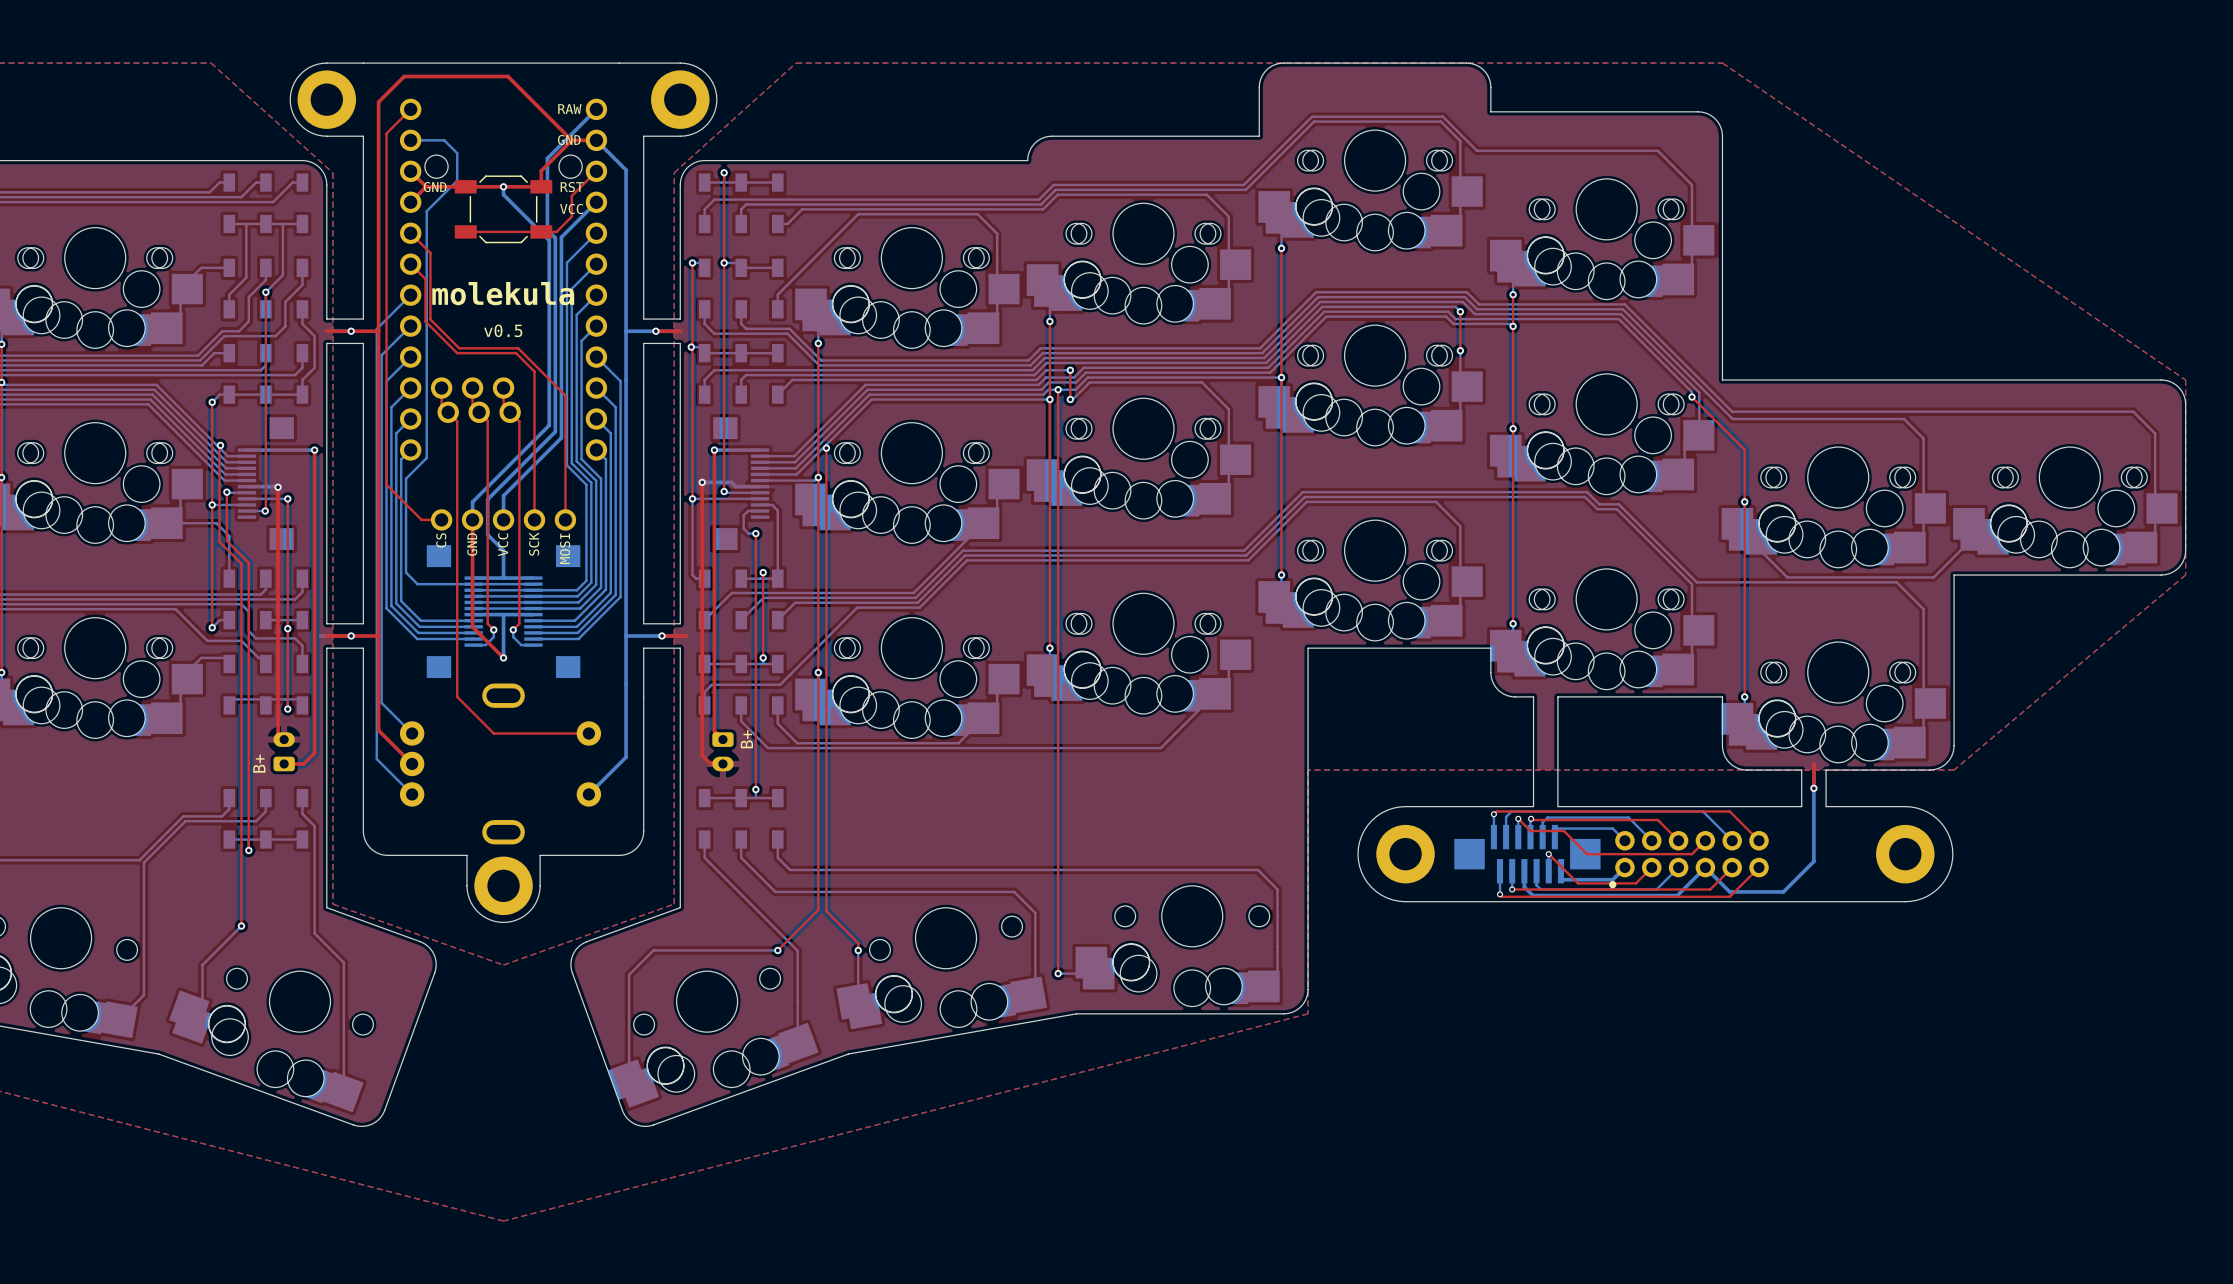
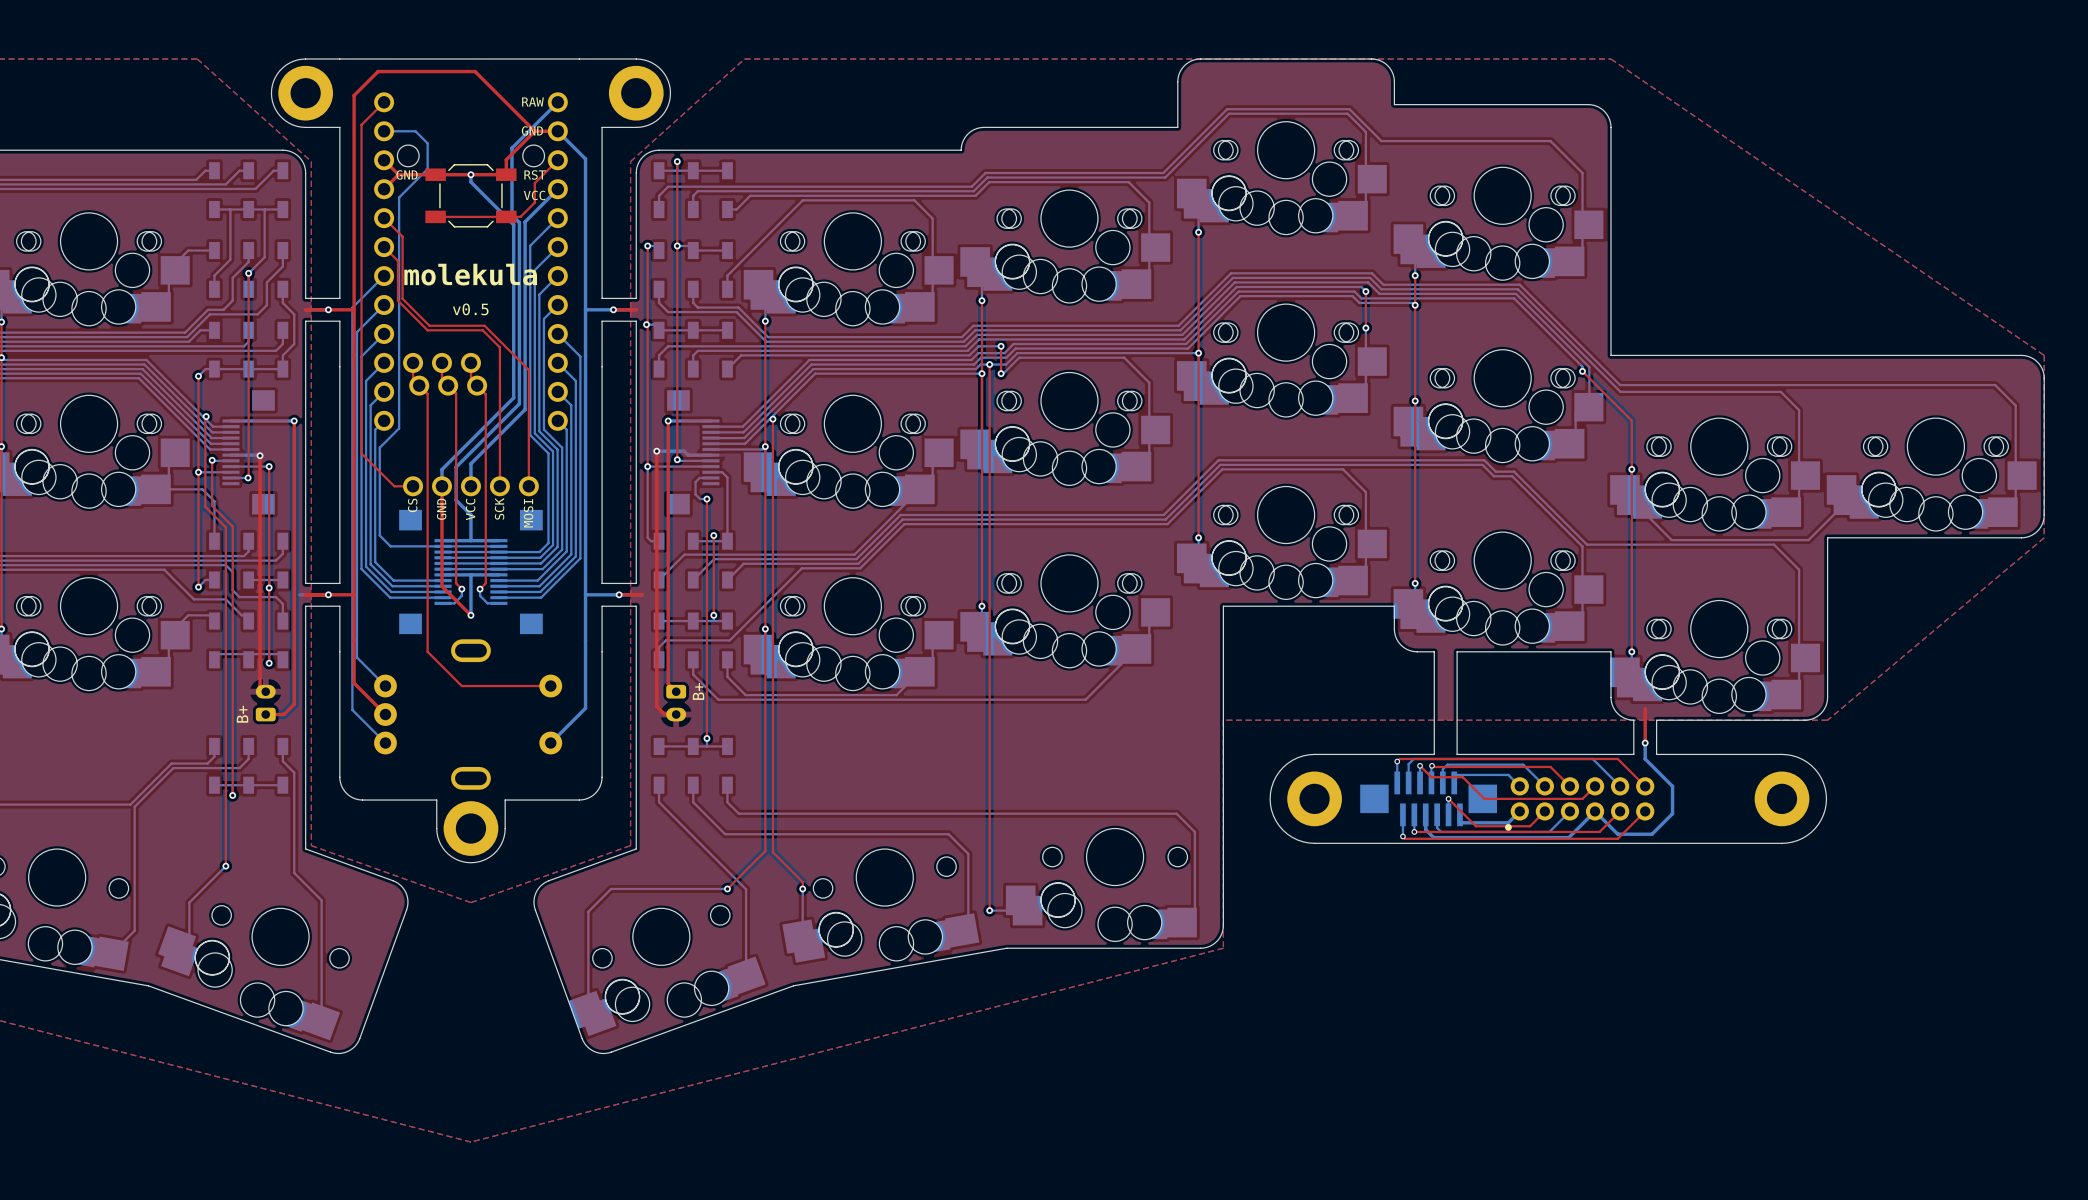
top track: none -> (1645, 708) (1645, 743)
top track: (1813, 763) (1813, 788) -> none
bottom track: (1813, 763) (1813, 861) (1783, 891) (1766, 891) -> (1645, 743) (1645, 758) (1672, 786) (1672, 813) (1652, 834)
board edge: (1746, 770) (1771, 770) -> (1633, 720) (1633, 754)
board edge: (1801, 770) (1801, 806) -> (1685, 720) (1707, 720)
board edge: (1826, 770) (1826, 806) -> (1685, 754) (1707, 754)
via position: (1813, 788) -> (1645, 743)
board edge: (1746, 806) (1771, 806) -> (1656, 720) (1656, 754)

